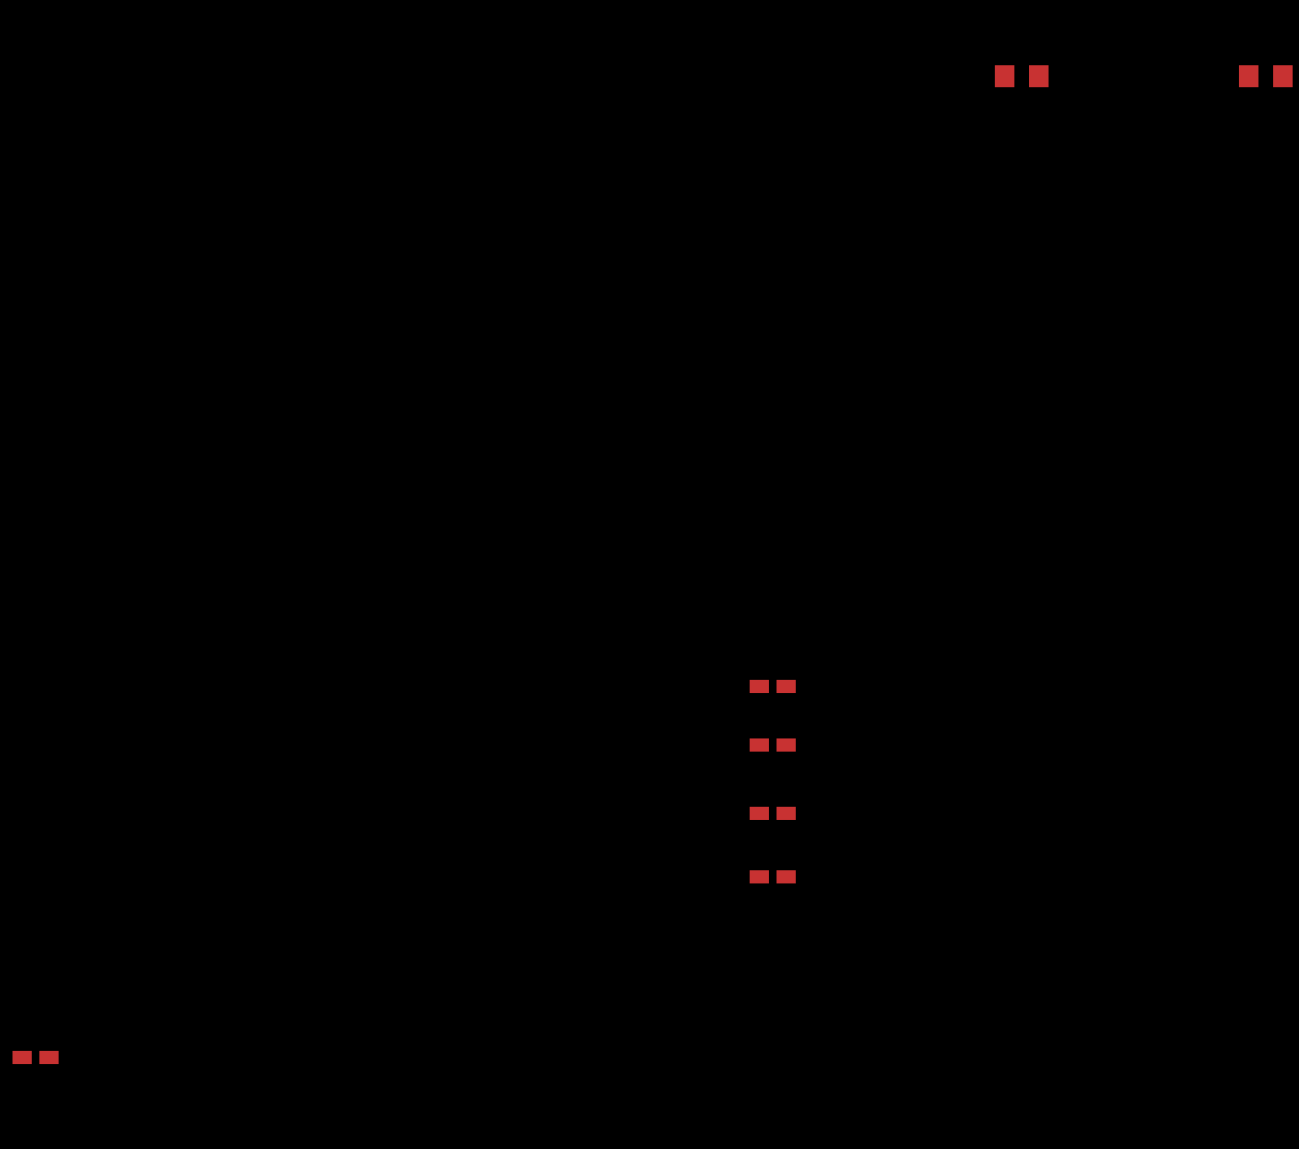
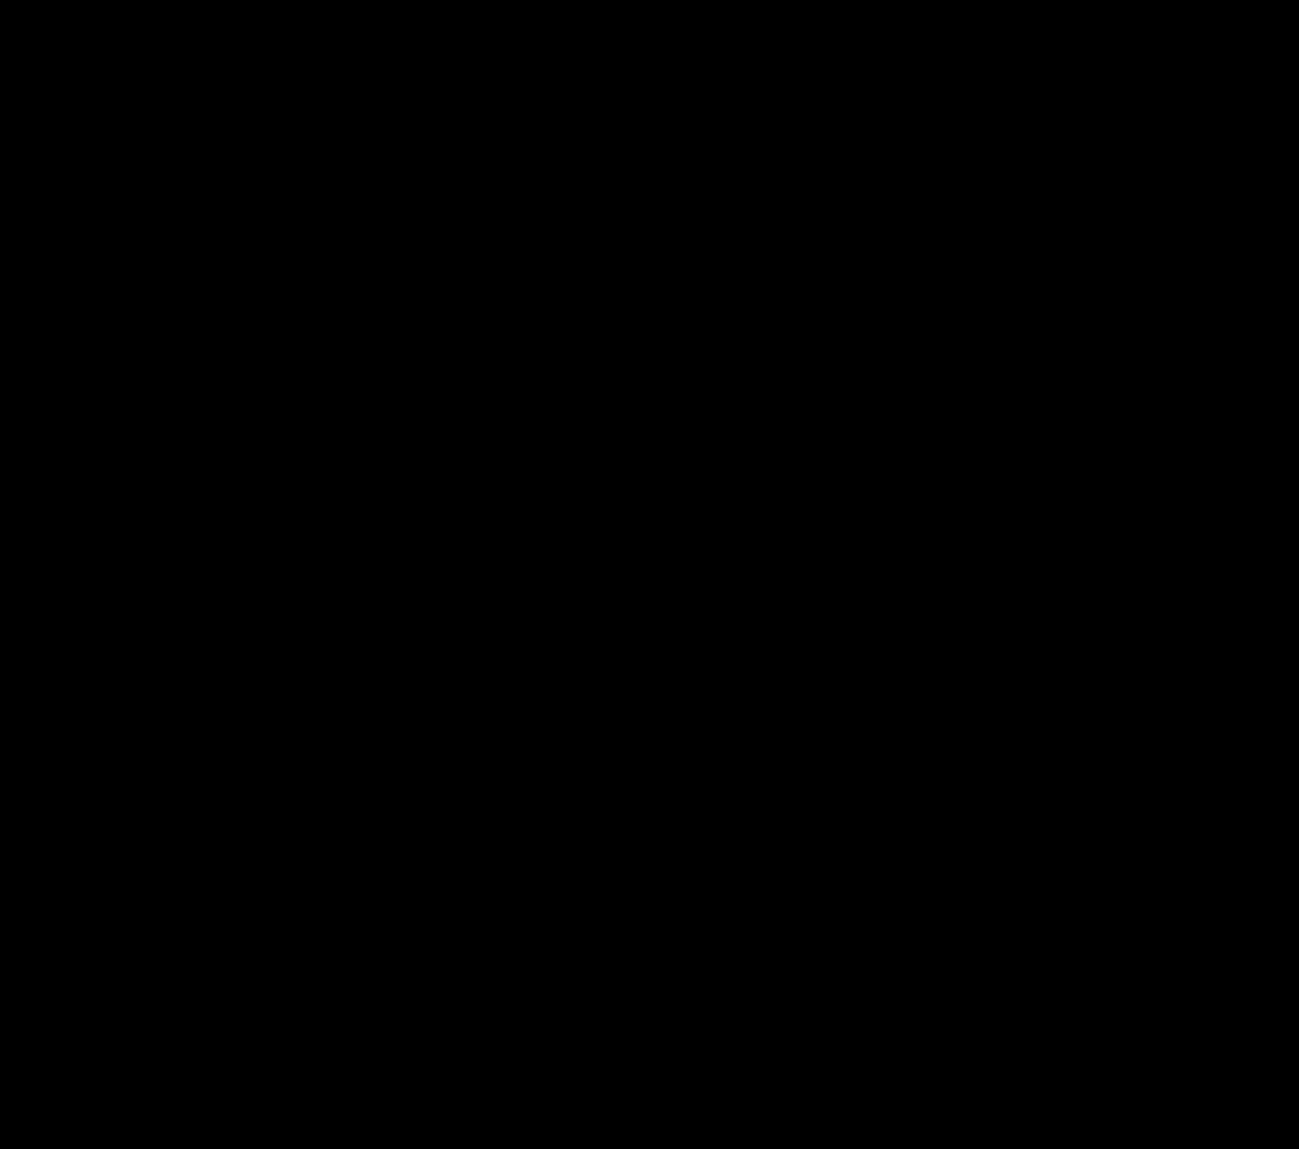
part: (1021, 76) -> none
part: (1265, 76) -> none
part: (772, 686) -> none
part: (772, 745) -> none
part: (772, 813) -> none
part: (772, 876) -> none
part: (35, 1057) -> none

